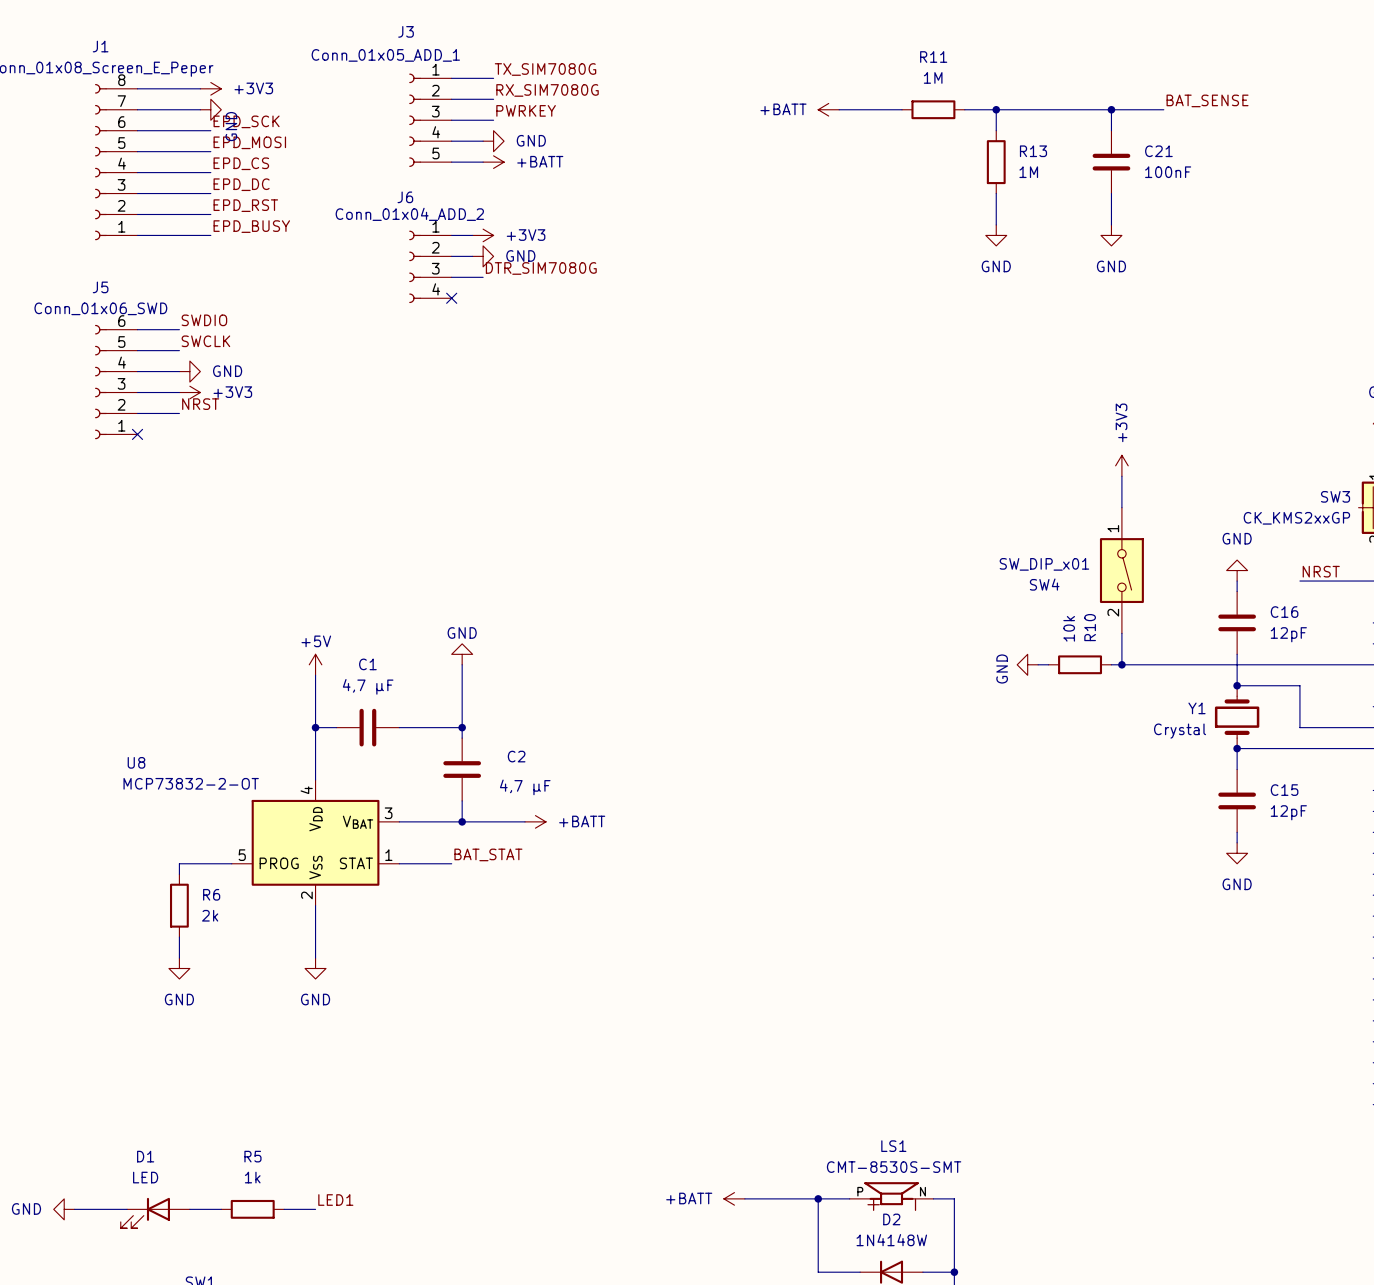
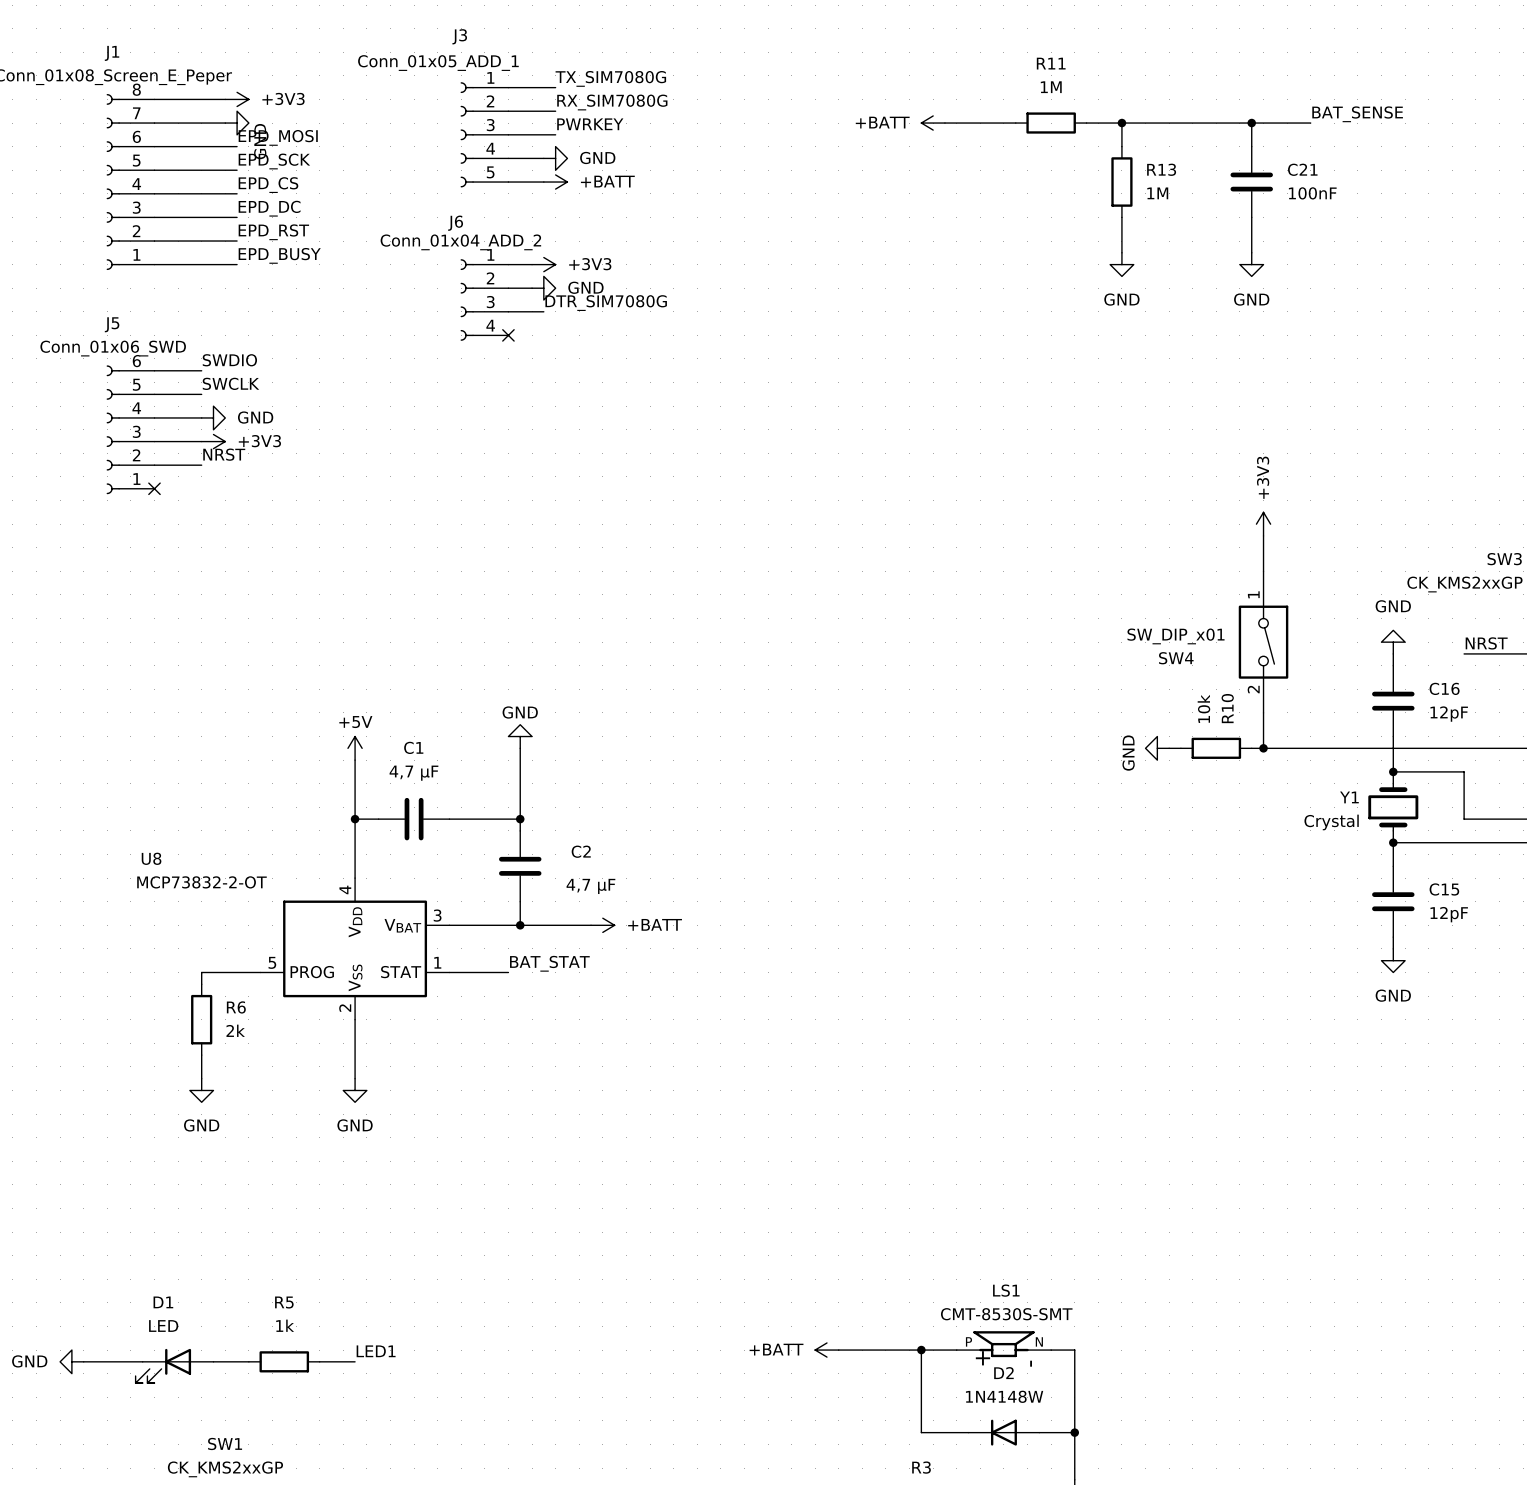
label: EPD_SCK (246, 121) -> EPD_MOSI (278, 137)
label: EPD_MOSI (249, 142) -> EPD_SCK (274, 161)

